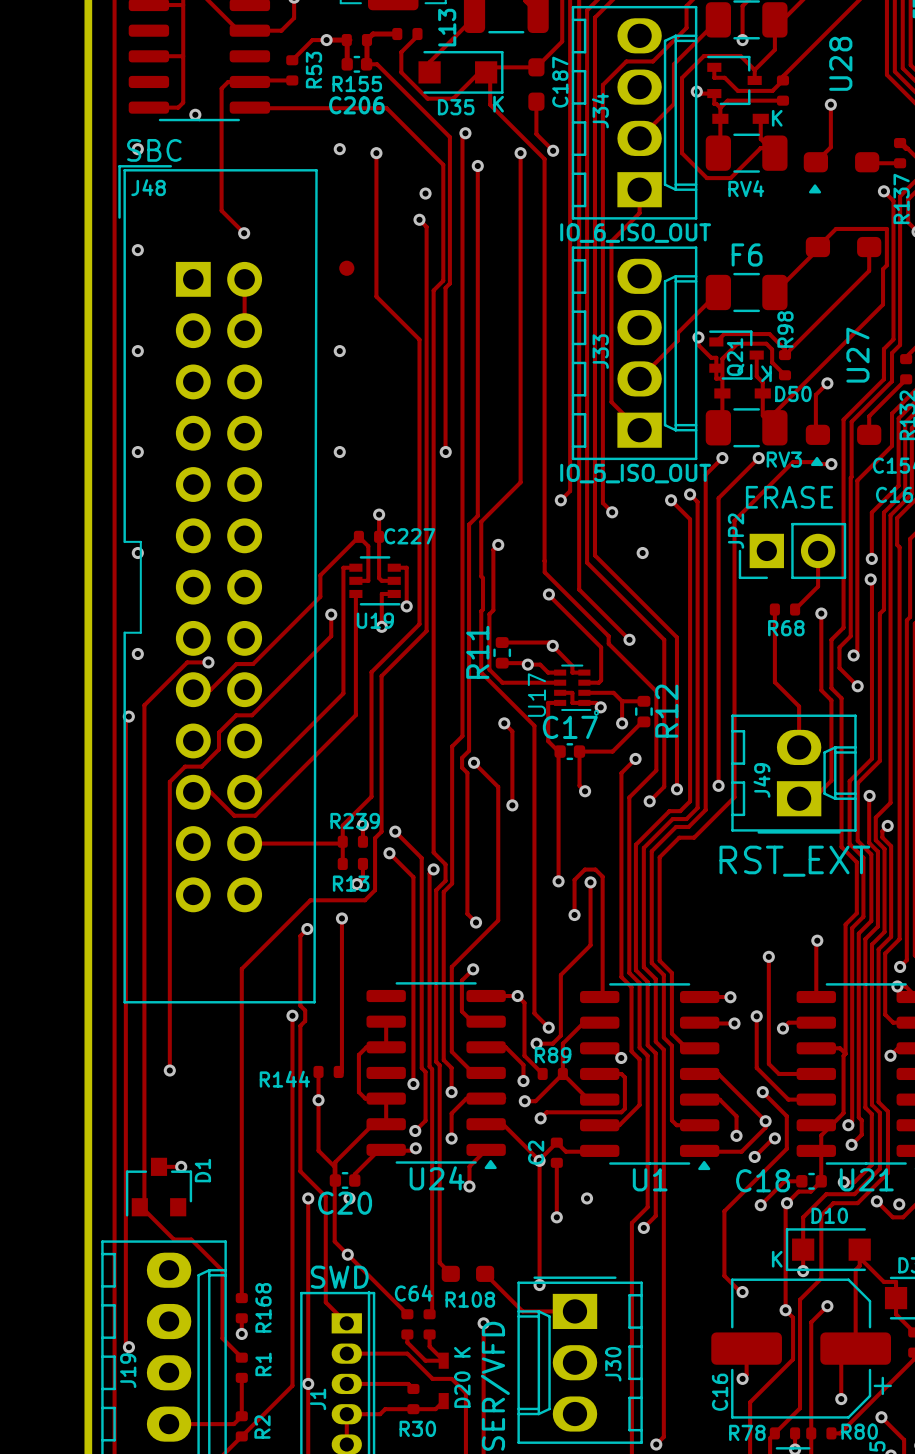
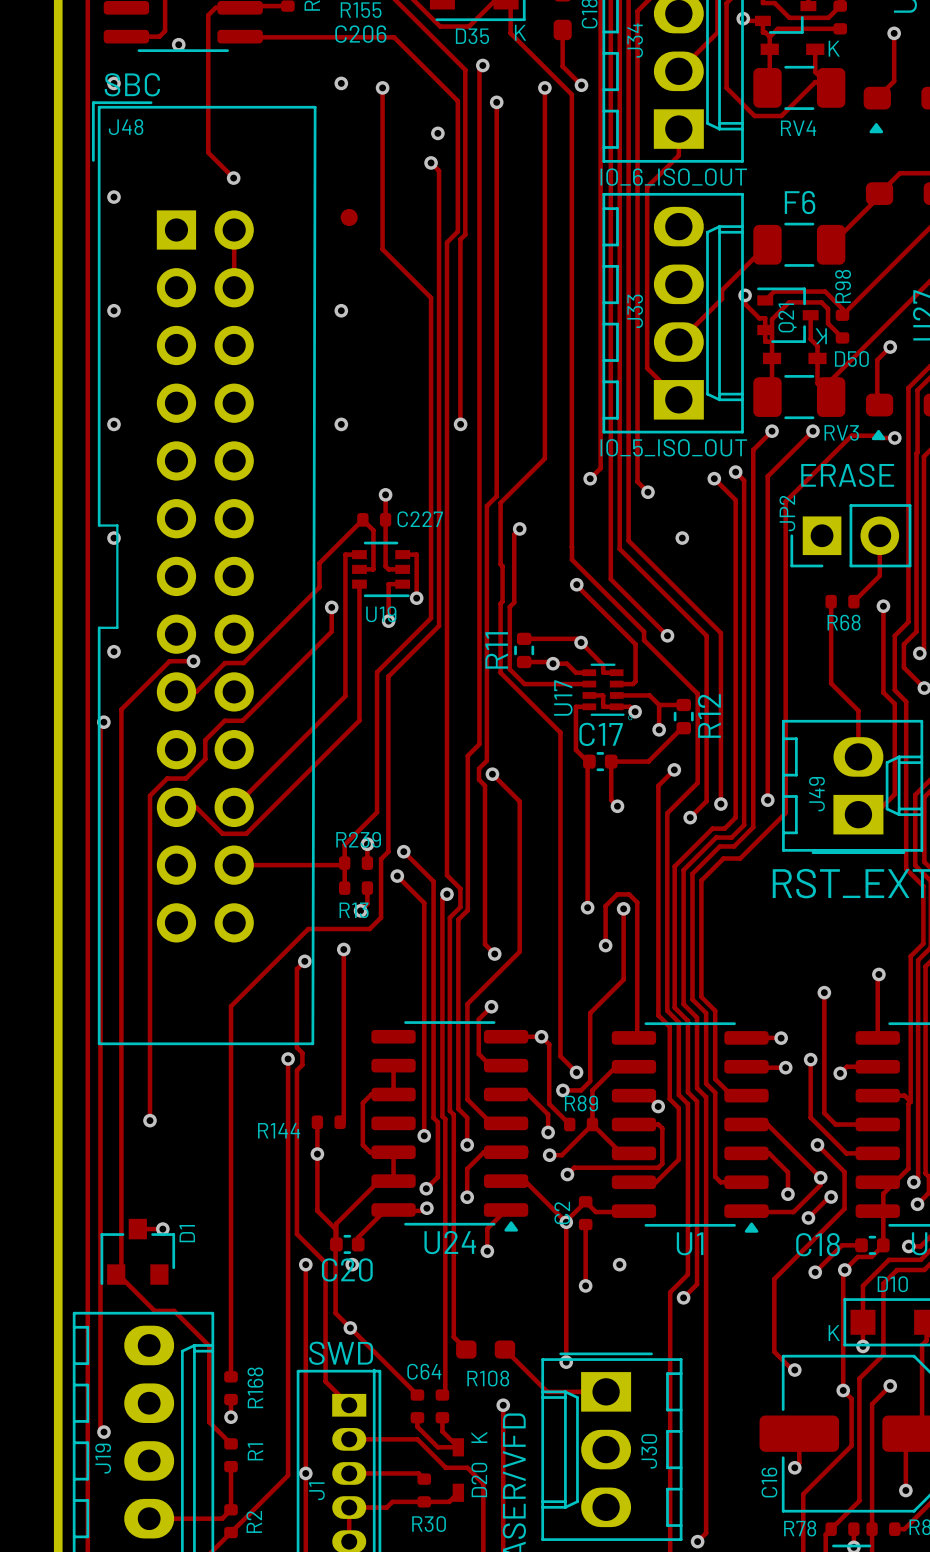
track: (504, 723) (512, 731) (512, 805) -> none
via: (504, 723) -> none
via: (512, 805) -> none

